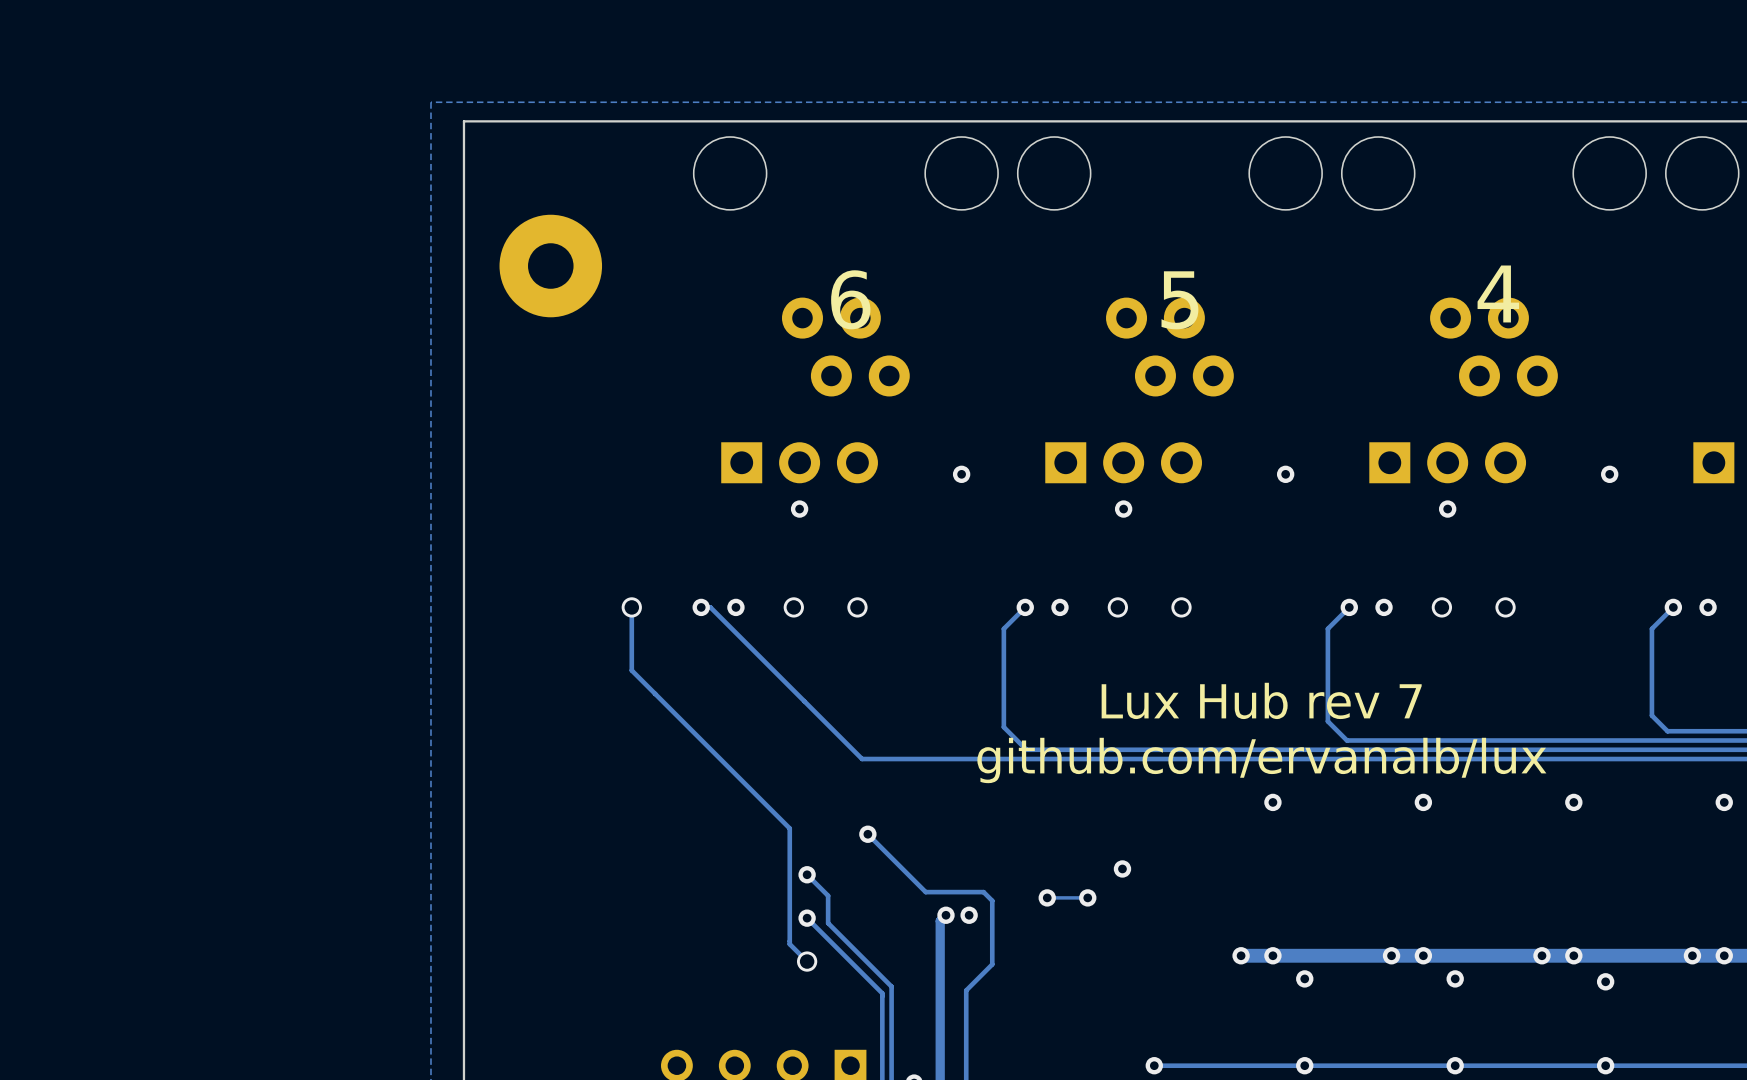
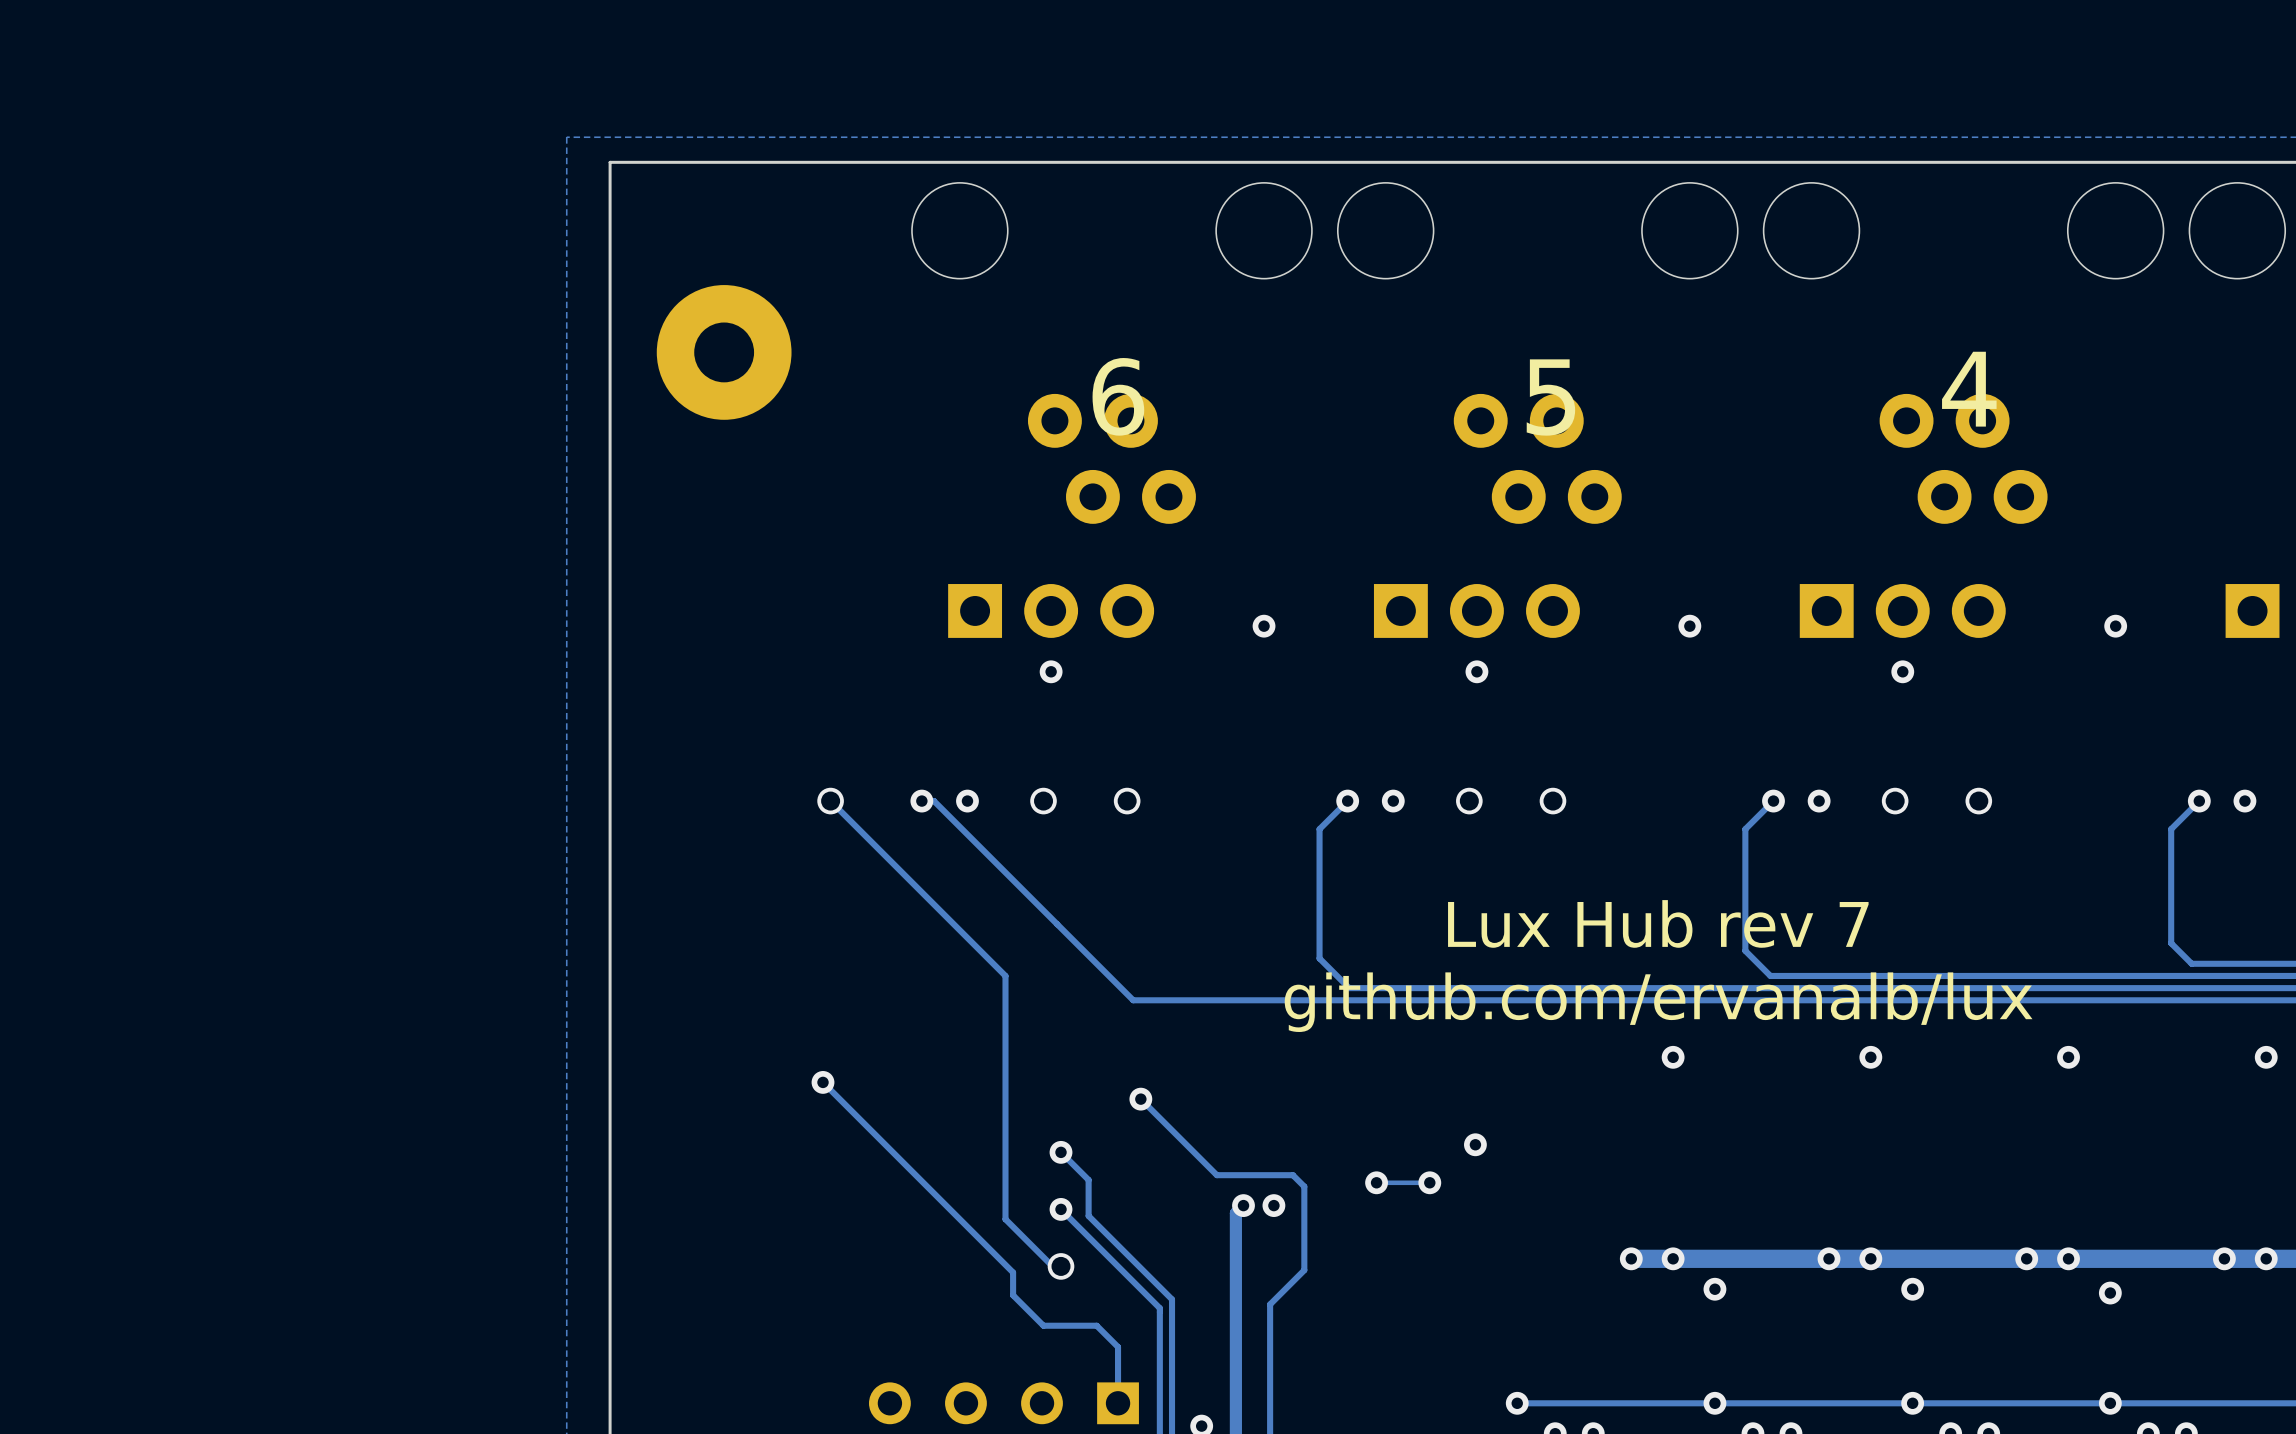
track: (631, 607) (631, 670) (789, 828) (789, 944) (807, 961) -> (830, 801) (1005, 975) (1005, 1219) (1058, 1272)
track: none -> (823, 1082) (1013, 1272) (1013, 1295) (1043, 1325) (1096, 1325) (1118, 1347) (1118, 1403)
via: none -> (823, 1082)

